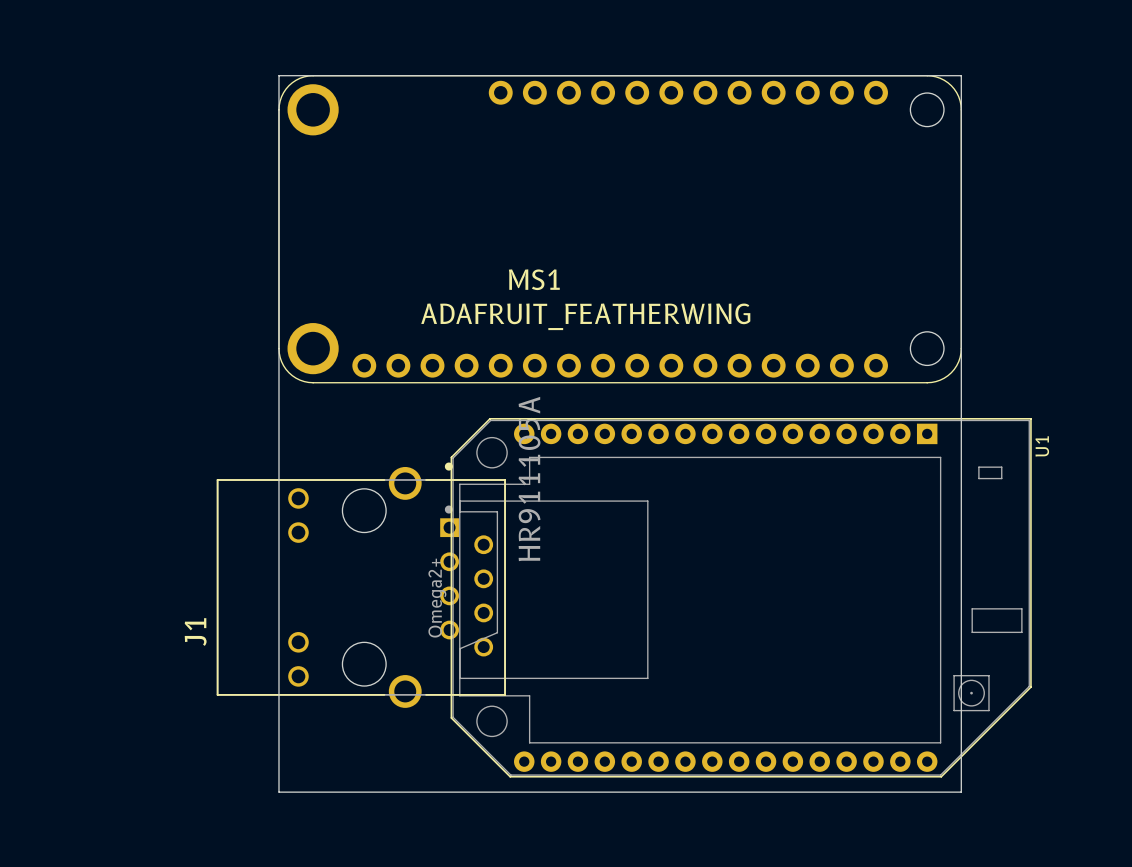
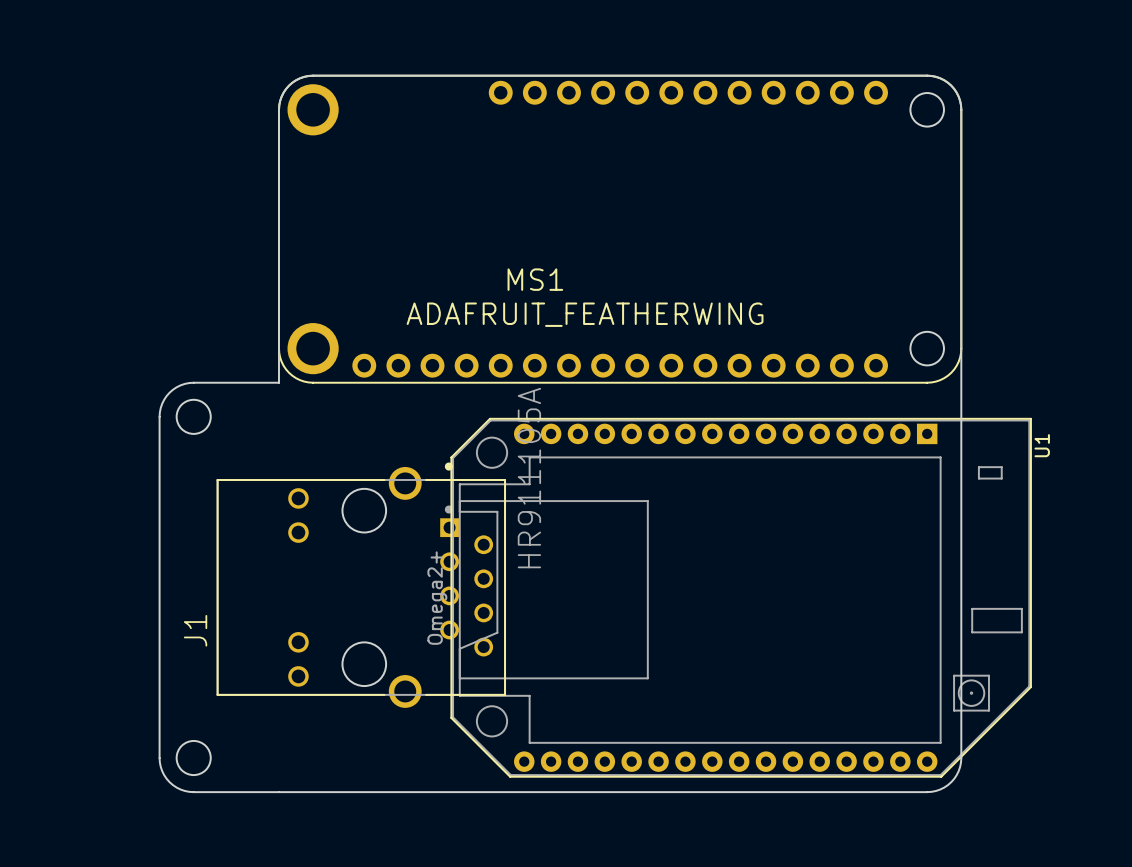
board edge: (313, 75) (278, 75) (278, 109) -> (313, 75) (300, 78) (288, 85) (281, 96) (278, 109)
board edge: (927, 75) (961, 75) (961, 109) -> (927, 75) (940, 78) (951, 85) (958, 96) (961, 109)
board edge: (278, 382) (278, 792) -> (278, 382) (184, 383) (172, 389) (166, 396) (160, 408) (159, 416) (160, 766) (169, 782) (184, 790) (278, 792)
round board edge: none -> [176, 399, 212, 435]
round board edge: none -> [176, 740, 212, 776]
board edge: (961, 758) (961, 792) (927, 792) -> (961, 758) (958, 771) (951, 782) (940, 789) (927, 792)

